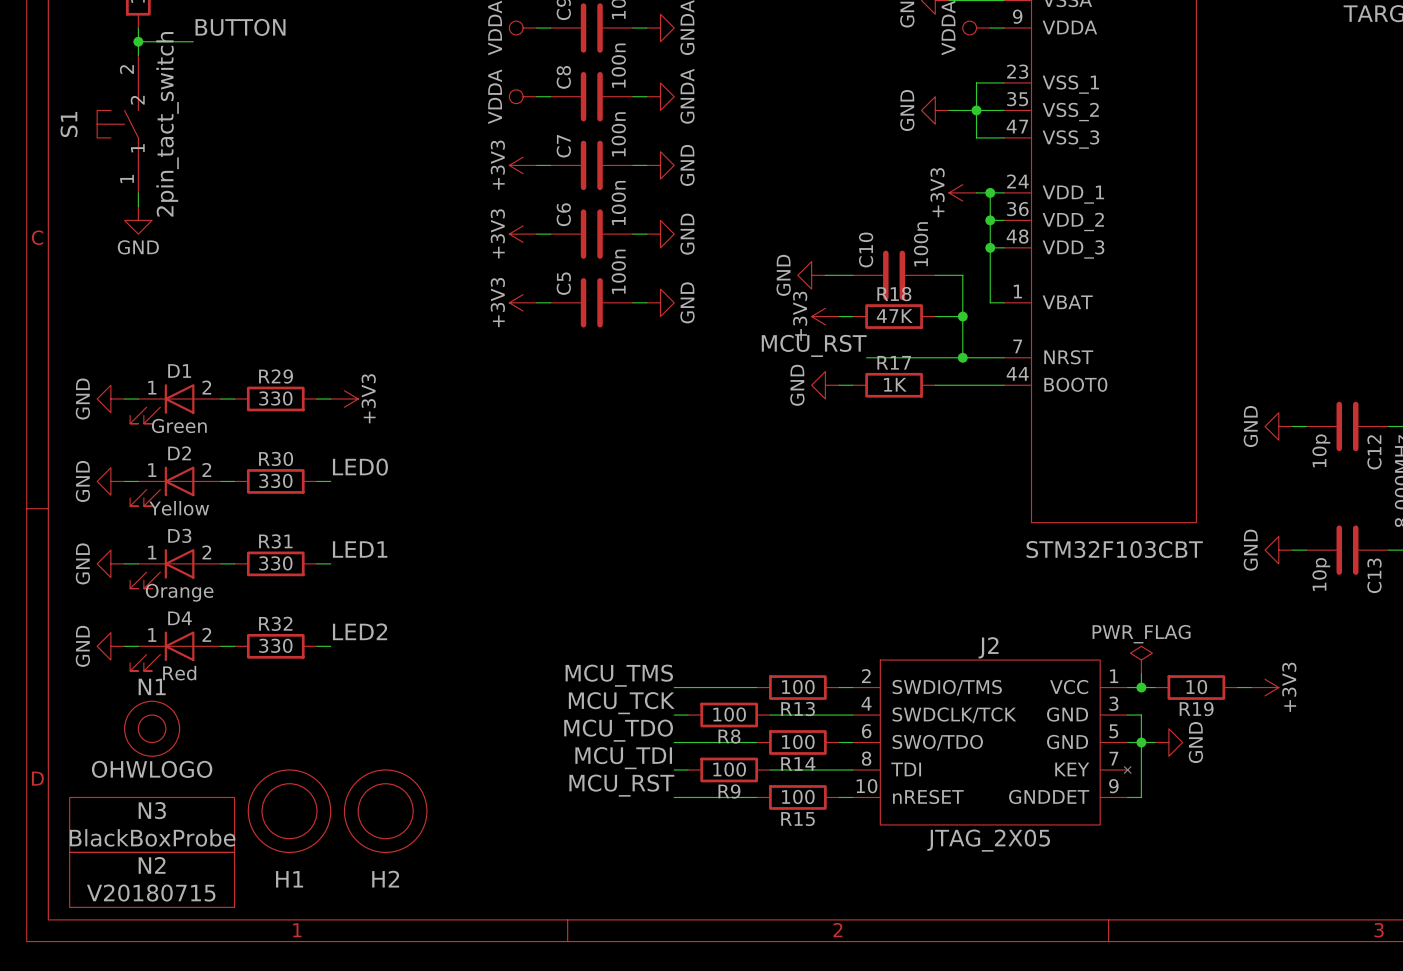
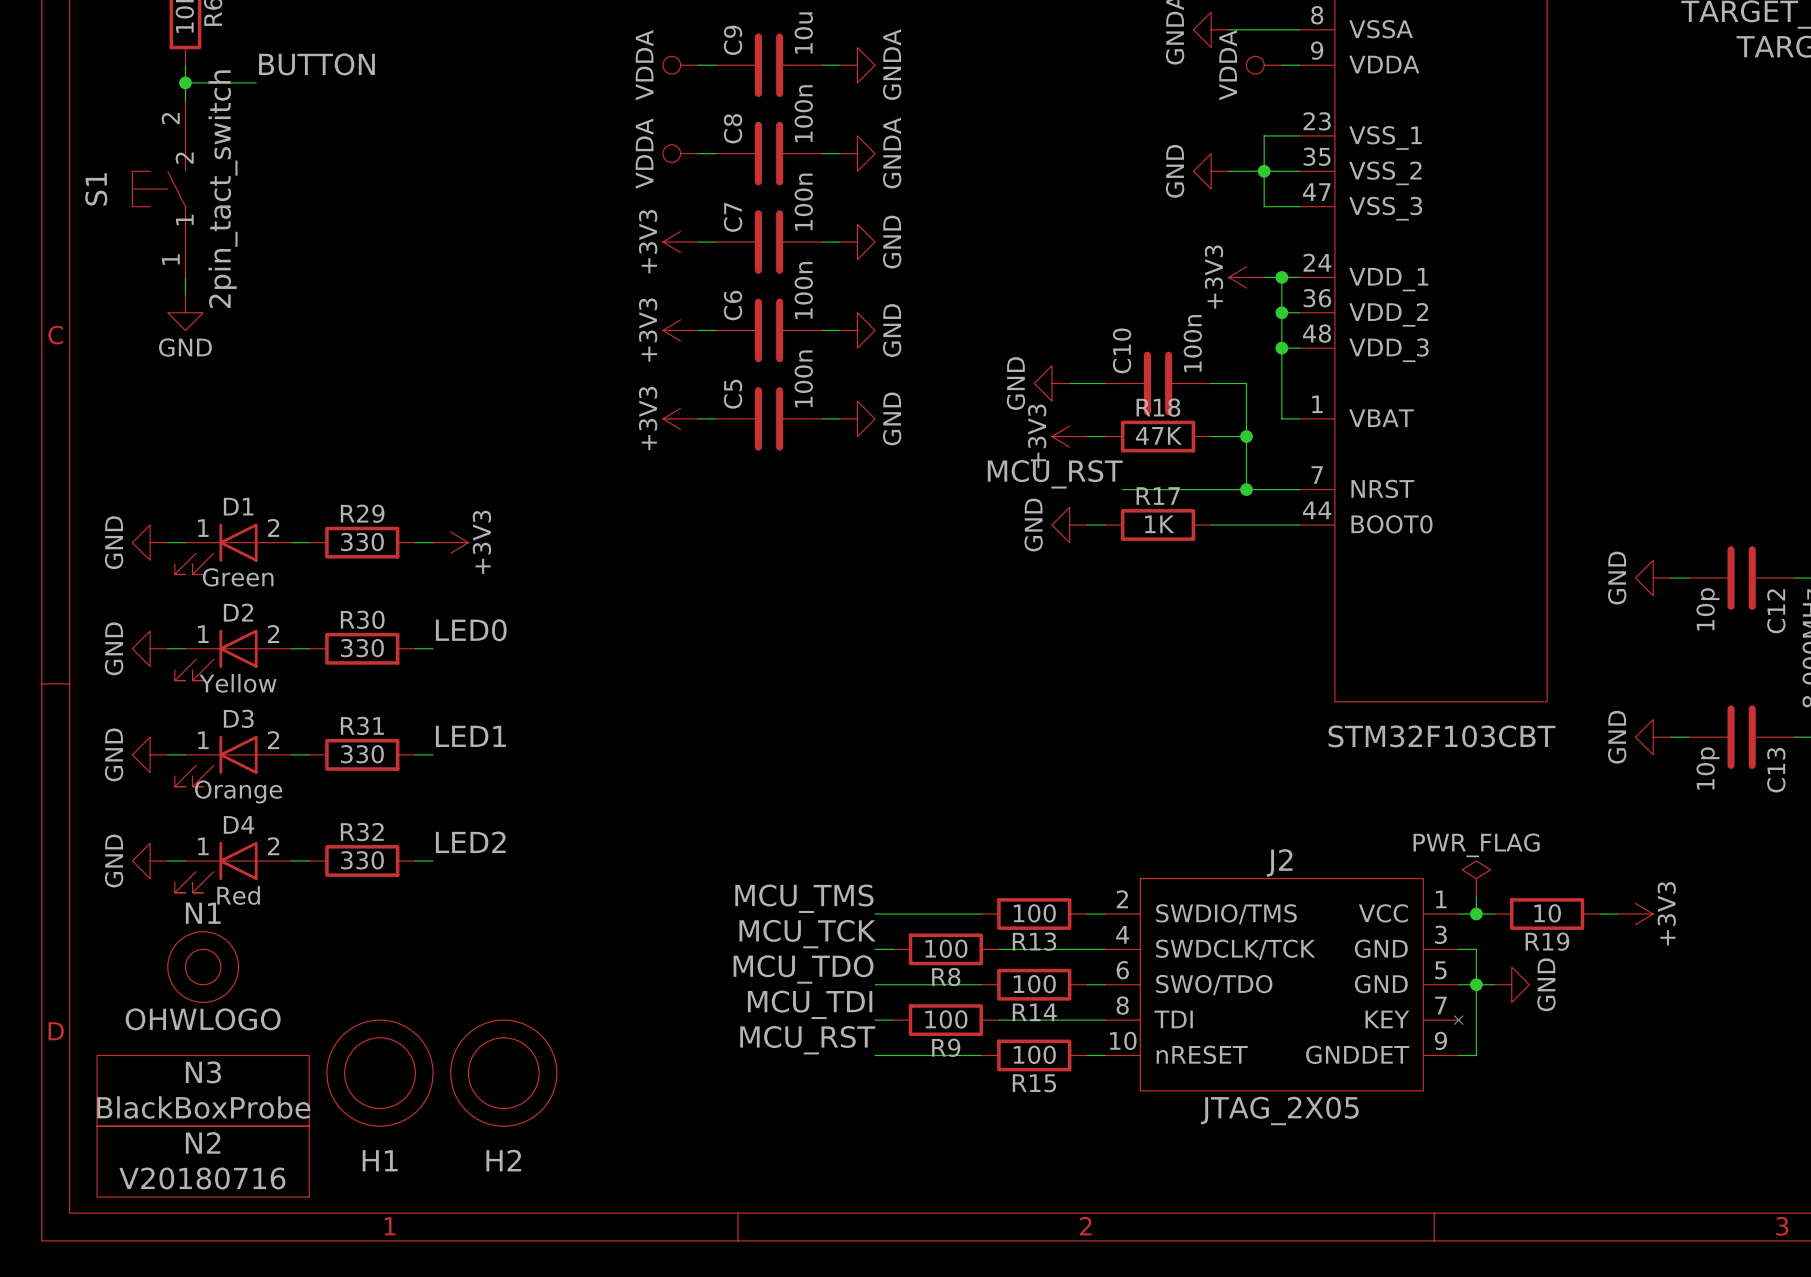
N2 value: V20180715 (151, 893) -> V20180716 (202, 1178)

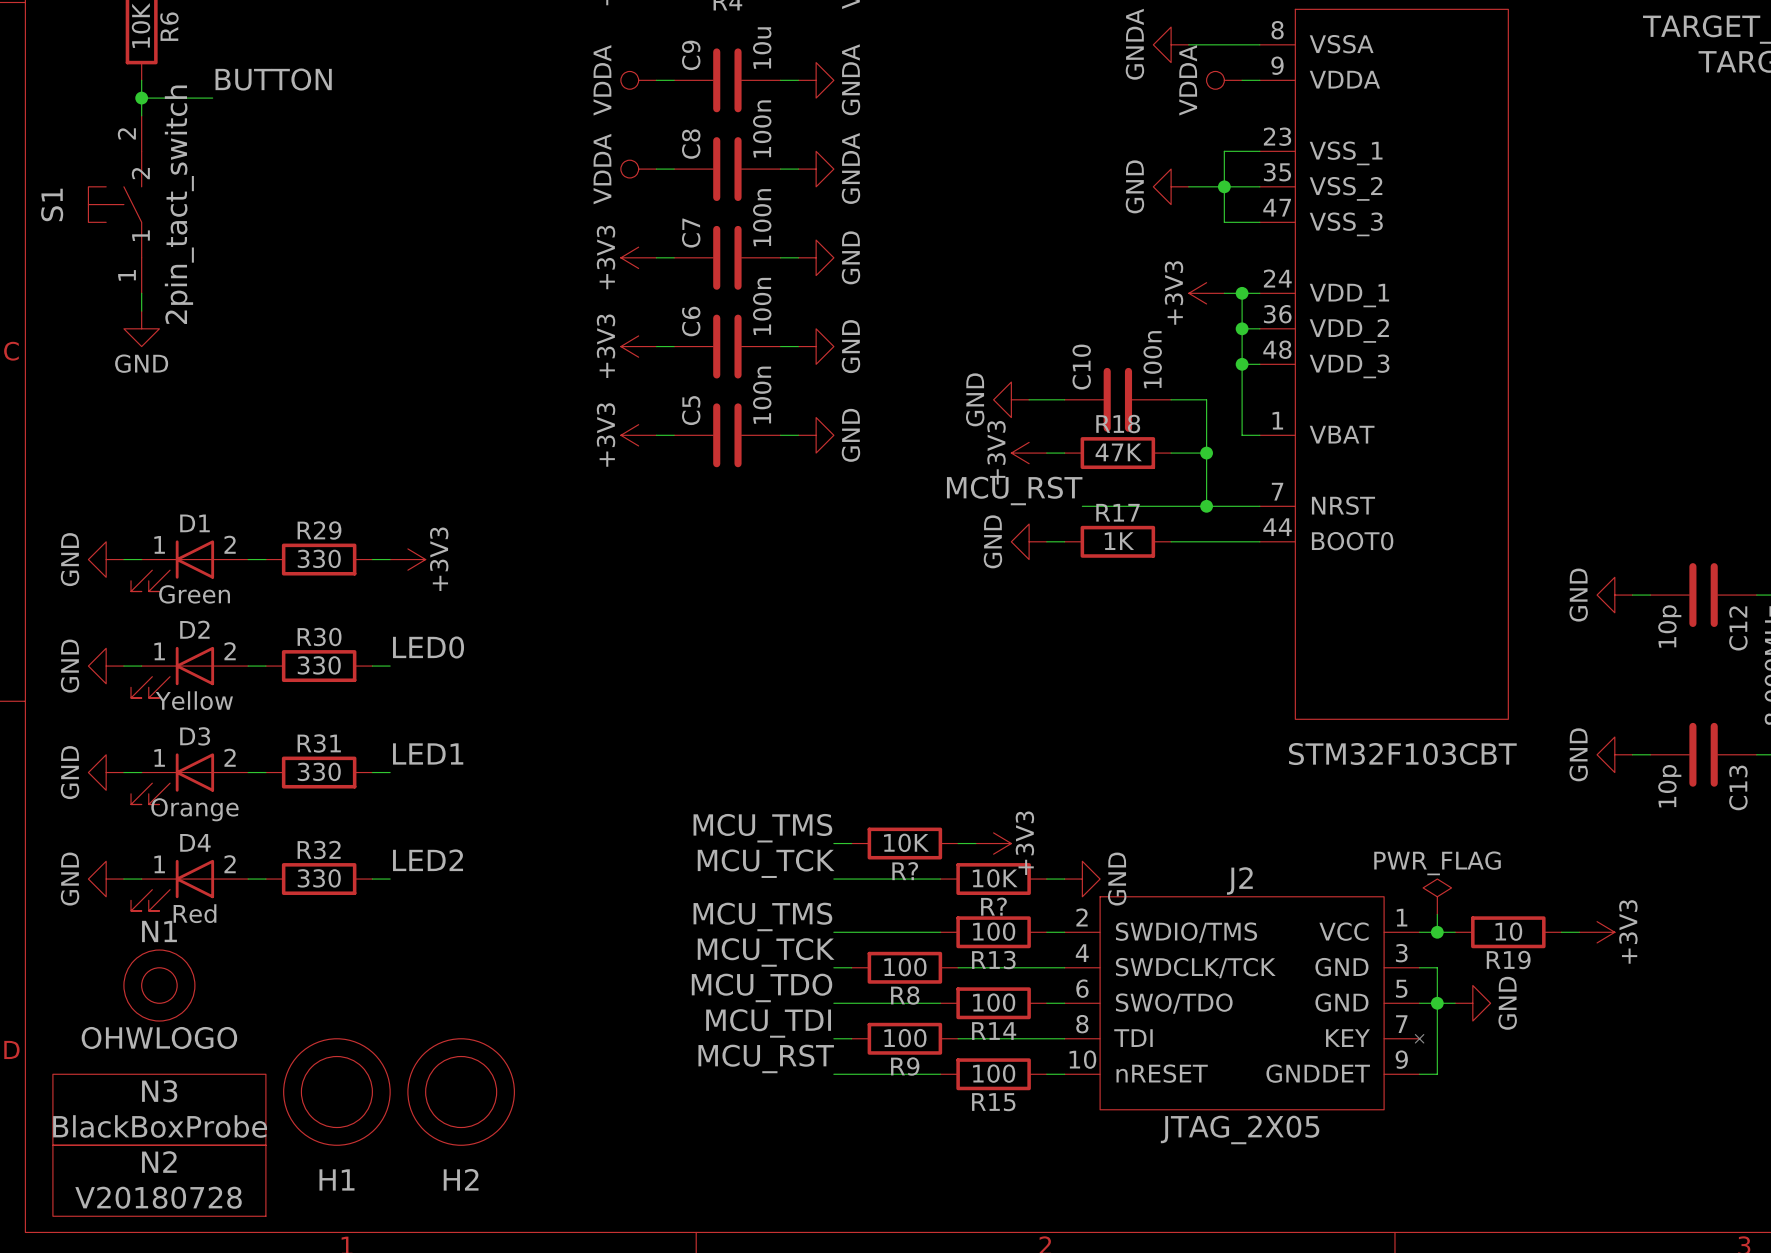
label: none -> MCU_TMS (762, 828)
wire: none -> (833, 843) (851, 843)
R?: none -> 10K (904, 843)
wire: none -> (958, 843) (975, 843)
power symbol: none -> +3V3 (993, 843)
label: none -> MCU_TCK (766, 863)
wire: none -> (833, 879) (940, 879)
R?: none -> 10K (993, 879)
wire: none -> (1046, 879) (1064, 879)
power symbol: none -> GND (1082, 879)
N2 value: V20180716 (202, 1178) -> V20180728 (158, 1197)

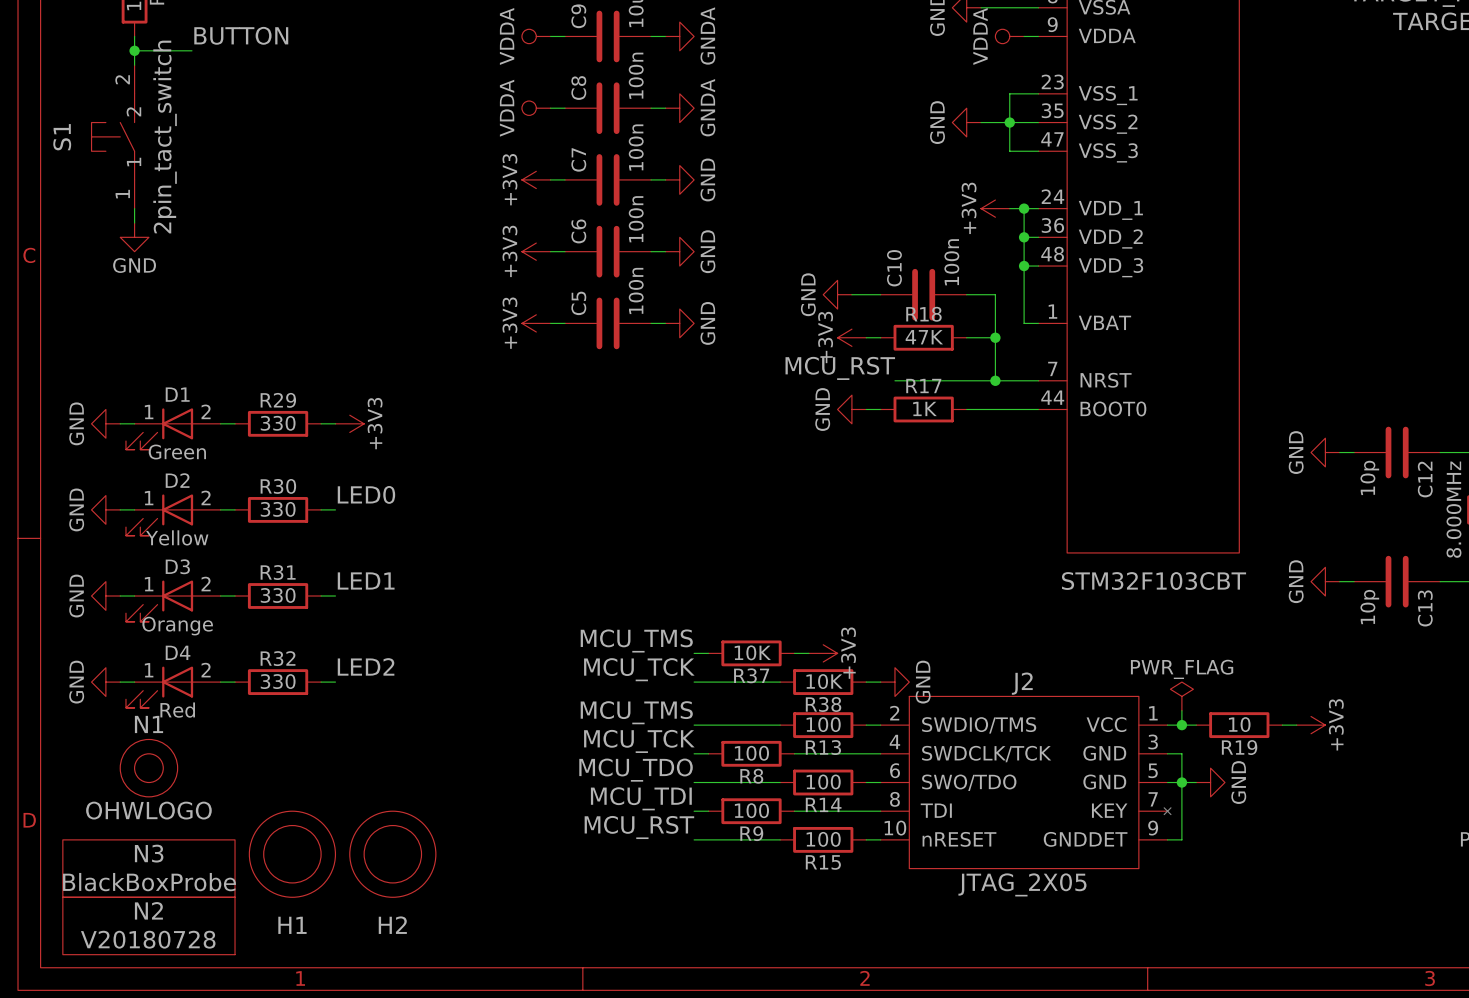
R? name: R? (905, 871) -> R37 (751, 675)
R? name: R? (993, 906) -> R38 (823, 704)

